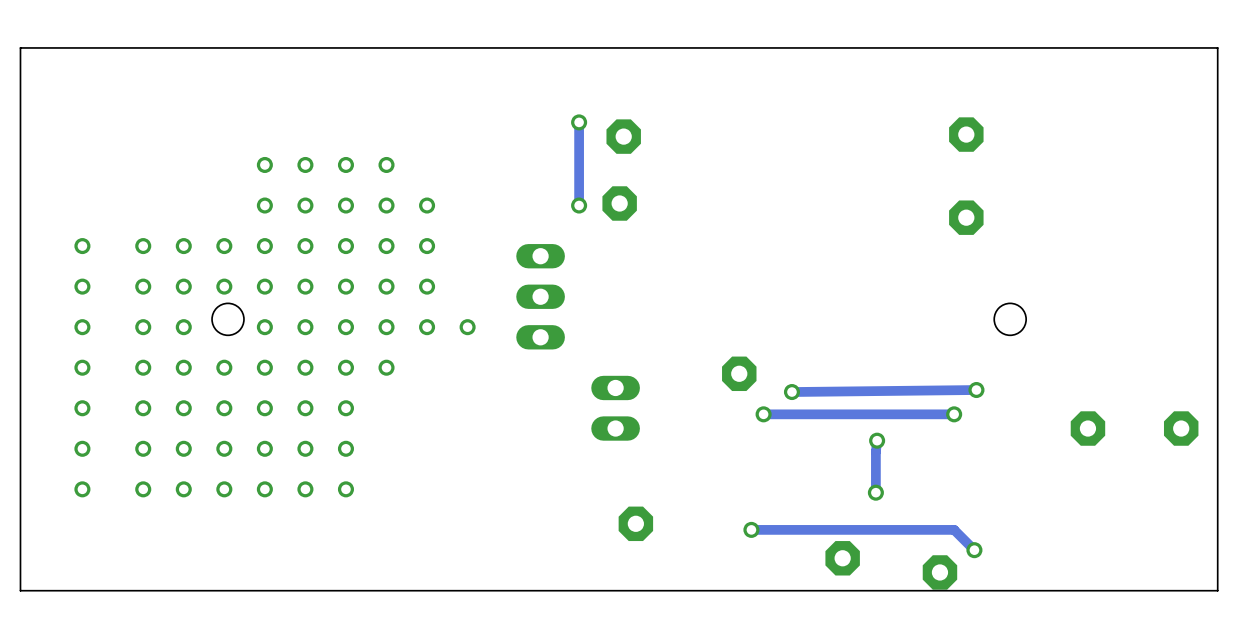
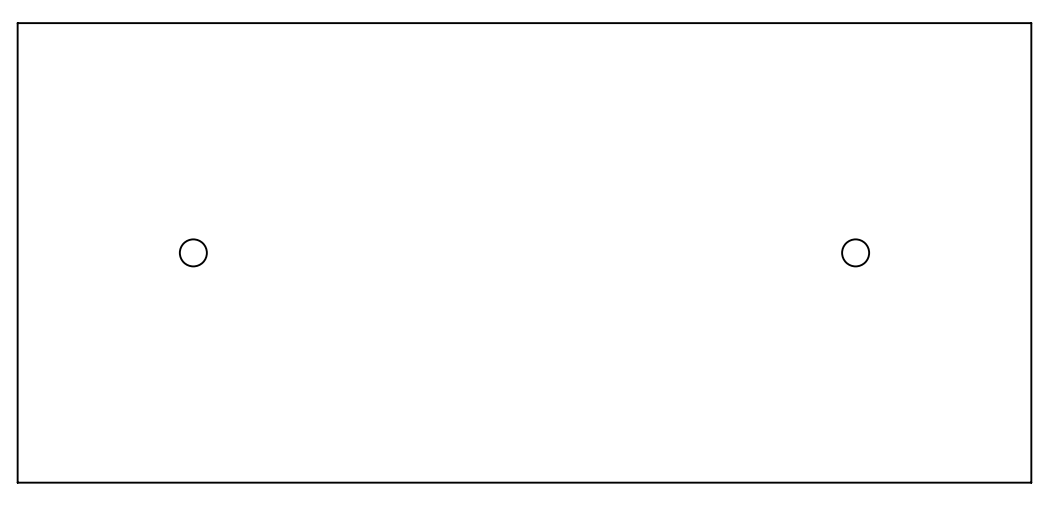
track: (579, 122) (579, 205) -> none
via: (579, 122) -> none
part: (966, 134) -> none
part: (623, 136) -> none
via: (264, 164) -> none
via: (305, 164) -> none
via: (345, 164) -> none
via: (386, 164) -> none
part: (619, 203) -> none
via: (264, 205) -> none
via: (305, 205) -> none
via: (345, 205) -> none
via: (386, 205) -> none
via: (427, 205) -> none
via: (579, 205) -> none
part: (966, 217) -> none
via: (82, 246) -> none
via: (143, 246) -> none
via: (183, 246) -> none
via: (224, 246) -> none
via: (264, 246) -> none
via: (305, 246) -> none
via: (345, 246) -> none
via: (386, 246) -> none
via: (427, 246) -> none
via: (82, 286) -> none
via: (143, 286) -> none
via: (183, 286) -> none
via: (224, 286) -> none
via: (264, 286) -> none
via: (305, 286) -> none
via: (345, 286) -> none
via: (386, 286) -> none
via: (427, 286) -> none
part: (540, 296) -> none
via: (82, 327) -> none
via: (143, 327) -> none
via: (183, 327) -> none
via: (264, 327) -> none
via: (305, 327) -> none
via: (345, 327) -> none
via: (386, 327) -> none
via: (427, 327) -> none
via: (467, 327) -> none
via: (82, 367) -> none
via: (143, 367) -> none
via: (183, 367) -> none
via: (224, 367) -> none
via: (264, 367) -> none
via: (305, 367) -> none
via: (345, 367) -> none
via: (386, 367) -> none
part: (739, 373) -> none
track: (976, 390) (791, 392) -> none
via: (976, 390) -> none
via: (791, 392) -> none
via: (82, 408) -> none
via: (143, 408) -> none
via: (183, 408) -> none
via: (224, 408) -> none
via: (264, 408) -> none
via: (305, 408) -> none
via: (345, 408) -> none
part: (615, 408) -> none
via: (763, 414) -> none
track: (954, 414) (763, 414) -> none
via: (954, 414) -> none
part: (1087, 428) -> none
part: (1181, 428) -> none
track: (877, 440) (875, 492) -> none
via: (877, 440) -> none
via: (82, 448) -> none
via: (143, 448) -> none
via: (183, 448) -> none
via: (224, 448) -> none
via: (264, 448) -> none
via: (305, 448) -> none
via: (345, 448) -> none
via: (82, 489) -> none
via: (143, 489) -> none
via: (183, 489) -> none
via: (224, 489) -> none
via: (264, 489) -> none
via: (305, 489) -> none
via: (345, 489) -> none
via: (875, 492) -> none
part: (635, 523) -> none
track: (751, 529) (954, 529) (974, 550) -> none
via: (751, 529) -> none
via: (974, 550) -> none
part: (842, 558) -> none
part: (939, 572) -> none

